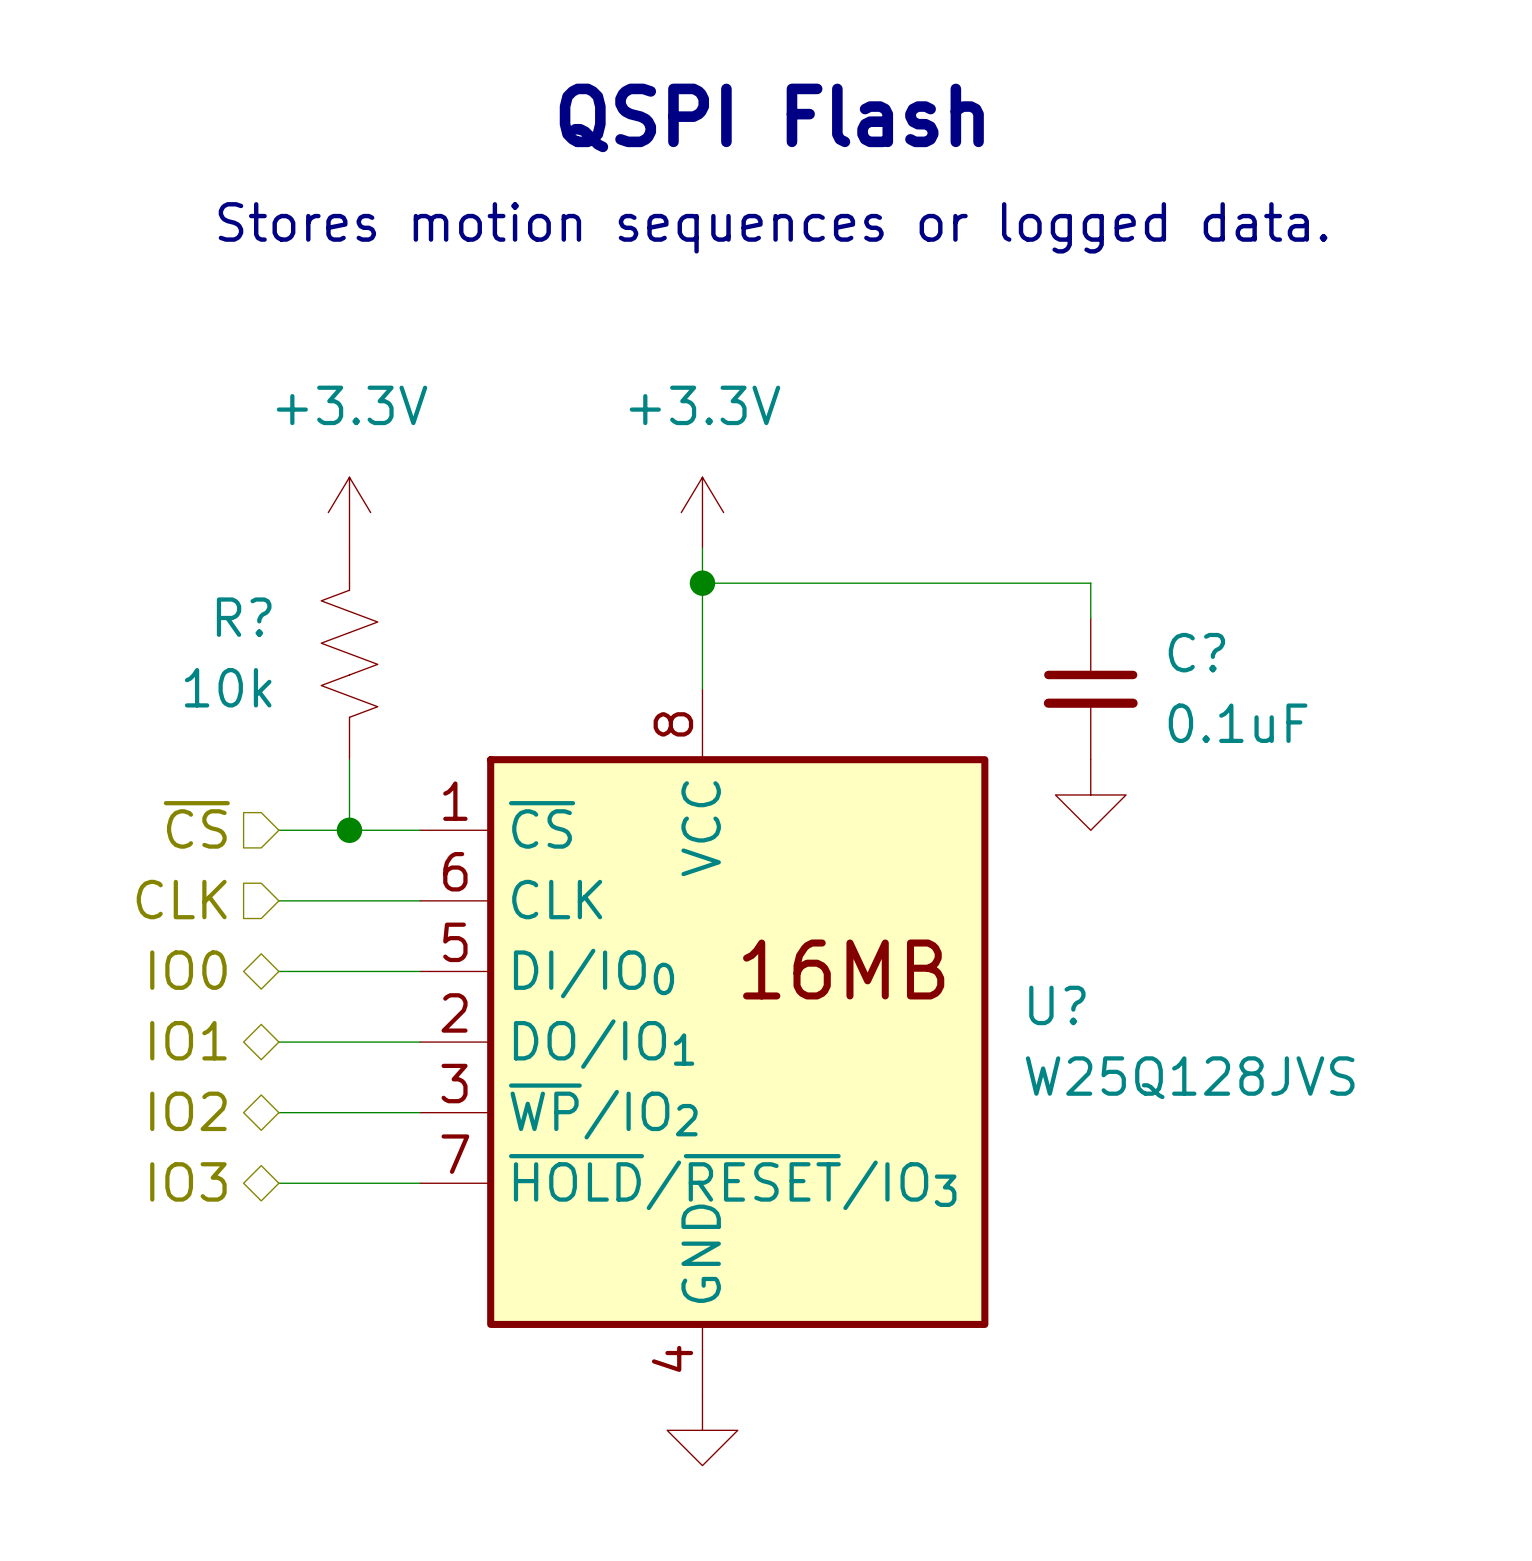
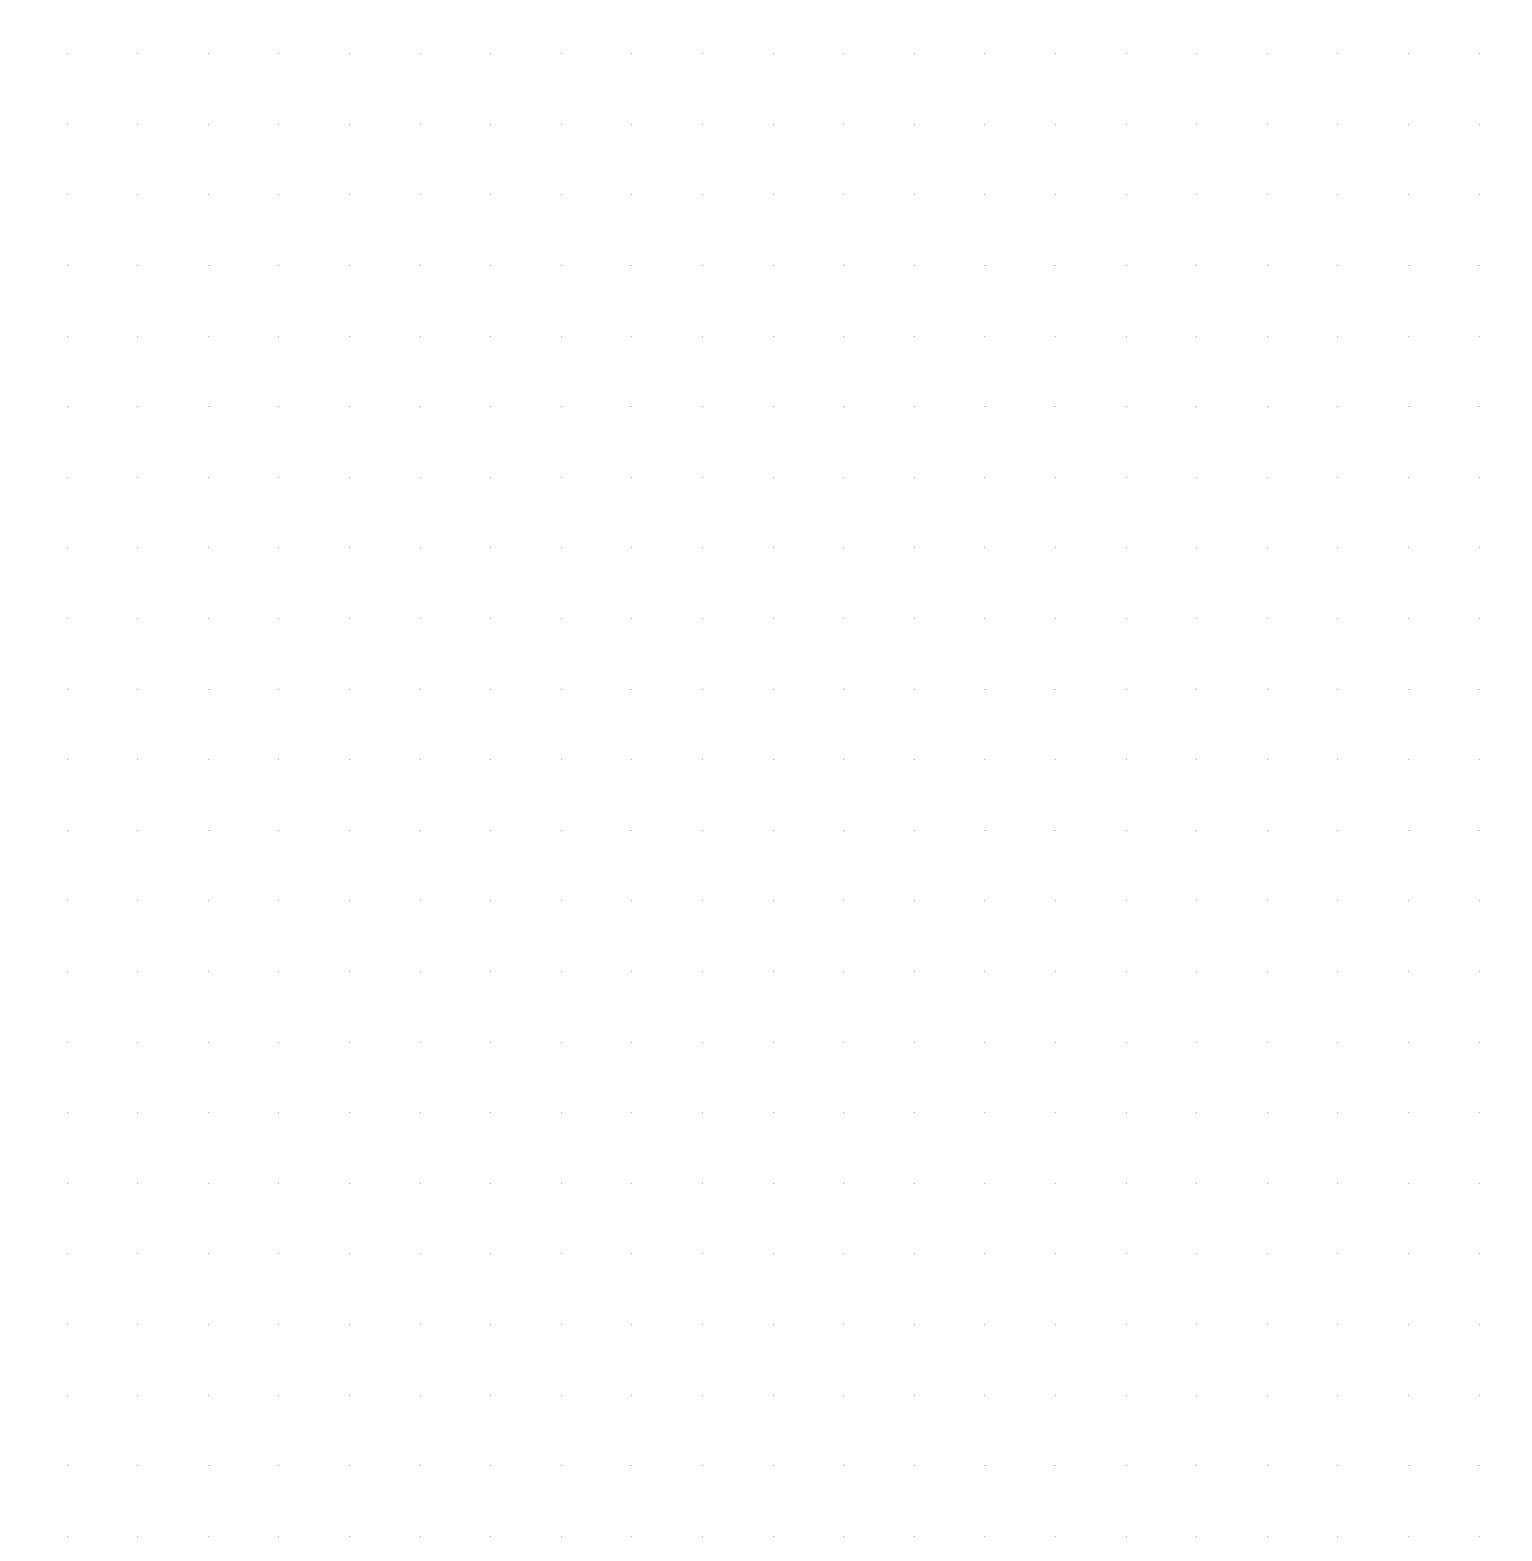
text: QSPI Flash (771, 117) -> none
text: Stores motion sequences or logged data. (773, 227) -> none
power symbol: +3.3V (349, 512) -> none
power symbol: +3.3V (702, 512) -> none
wire: (702, 547) (702, 689) -> none
wire: (702, 583) (1090, 583) (1090, 618) -> none
junction: (702, 583) -> none
R?: 10k (349, 653) -> none
C?: 0.1uF (1090, 689) -> none
wire: (349, 759) (349, 830) -> none
power symbol: (1090, 794) -> none
hierarchical label: ~{CS} (196, 824) -> none
wire: (278, 830) (420, 830) -> none
junction: (349, 830) -> none
hierarchical label: CLK (181, 899) -> none
wire: (278, 900) (420, 900) -> none
hierarchical label: IO0 (188, 970) -> none
wire: (278, 971) (420, 971) -> none
hierarchical label: IO1 (188, 1040) -> none
wire: (278, 1042) (420, 1042) -> none
U?: W25Q128JVS (704, 1042) -> none
hierarchical label: IO2 (188, 1111) -> none
wire: (278, 1112) (420, 1112) -> none
hierarchical label: IO3 (188, 1181) -> none
wire: (278, 1183) (420, 1183) -> none
power symbol: (702, 1430) -> none

